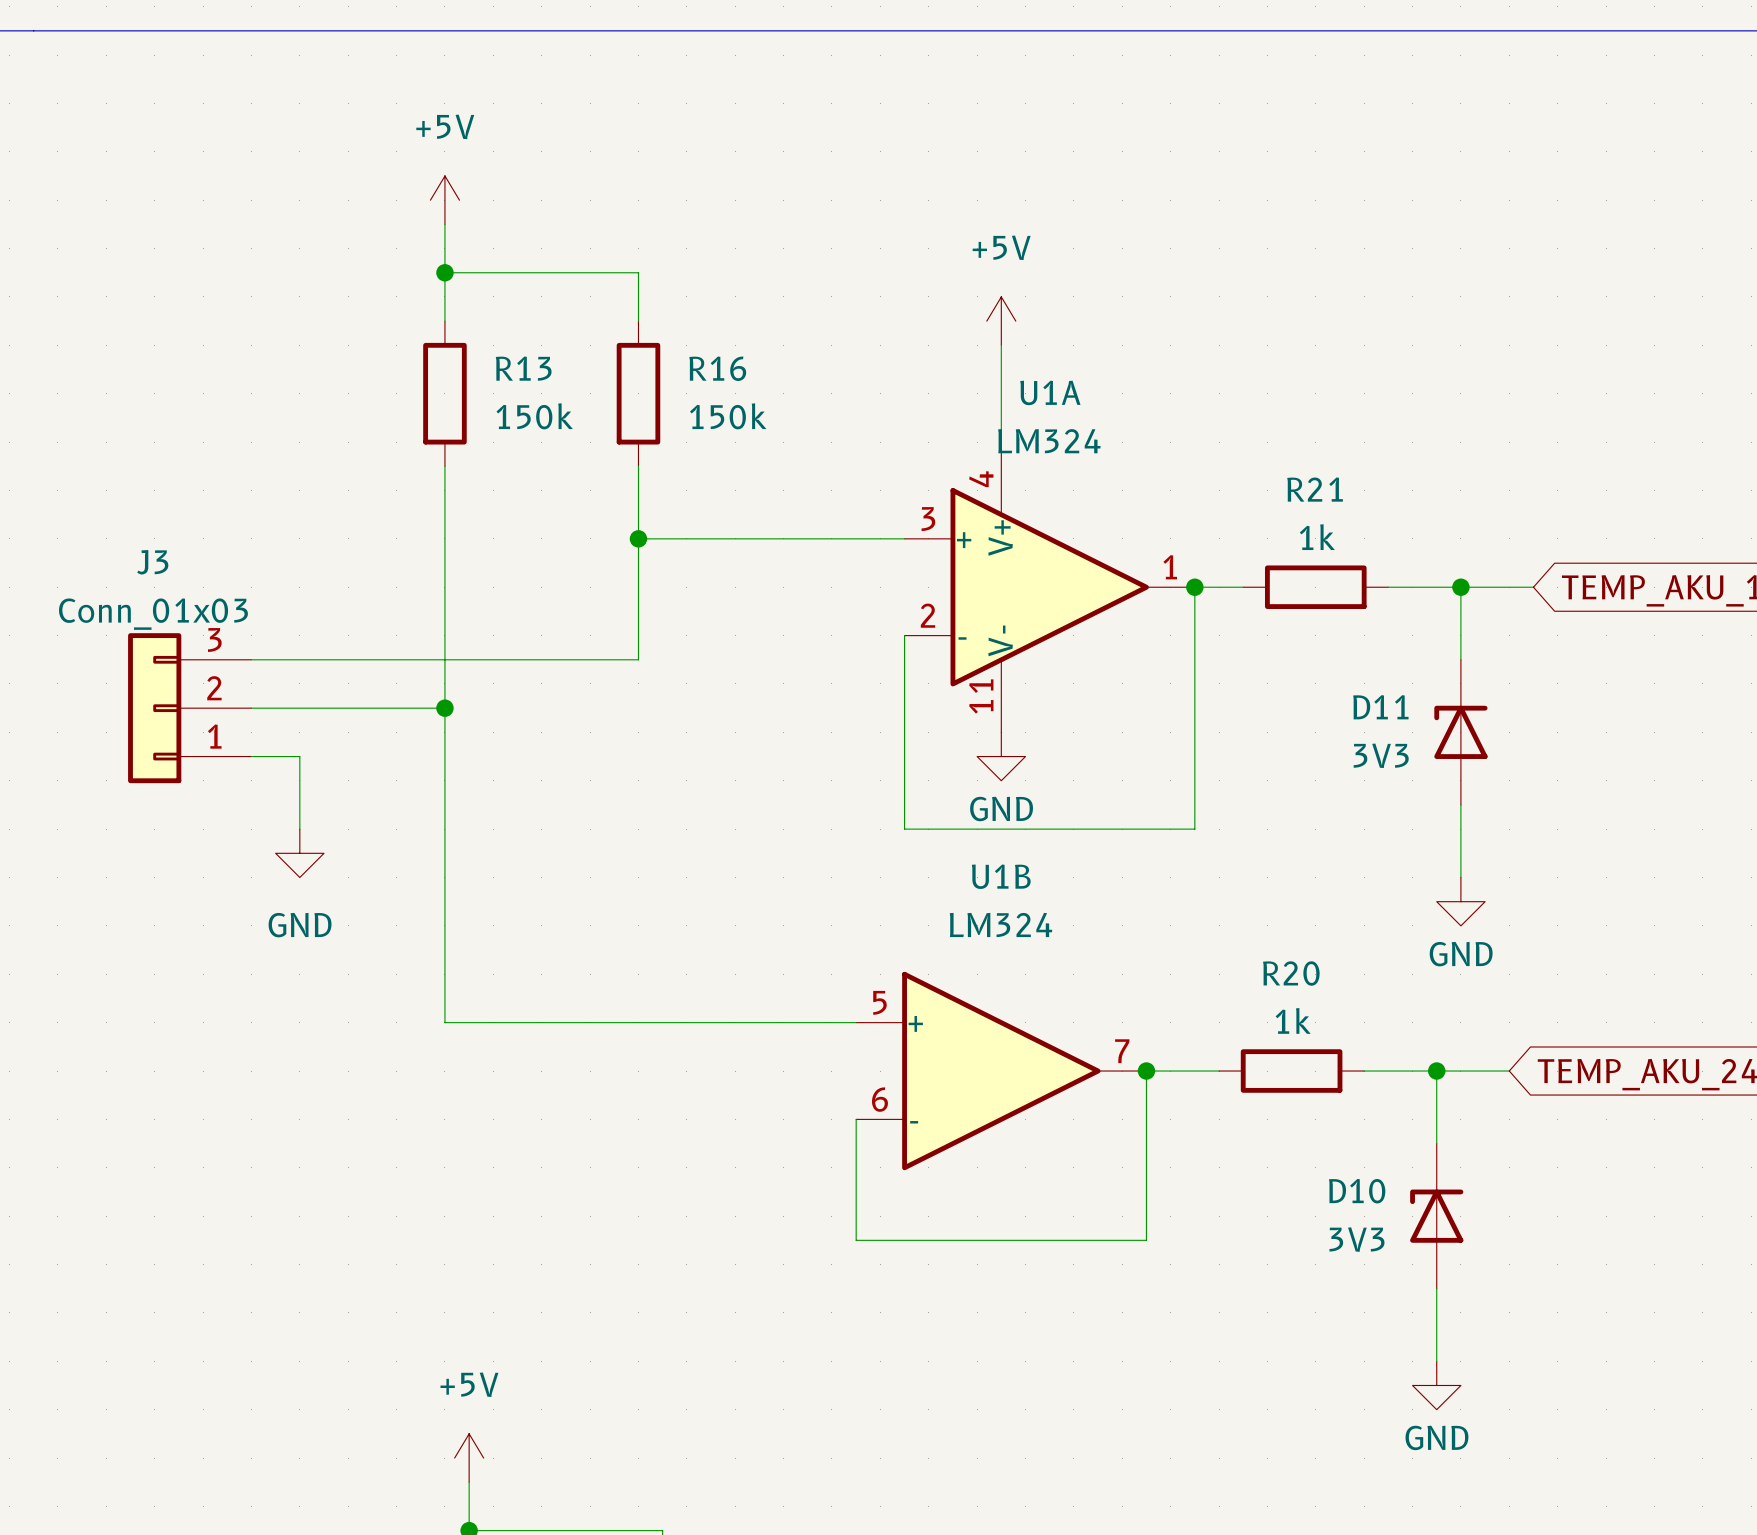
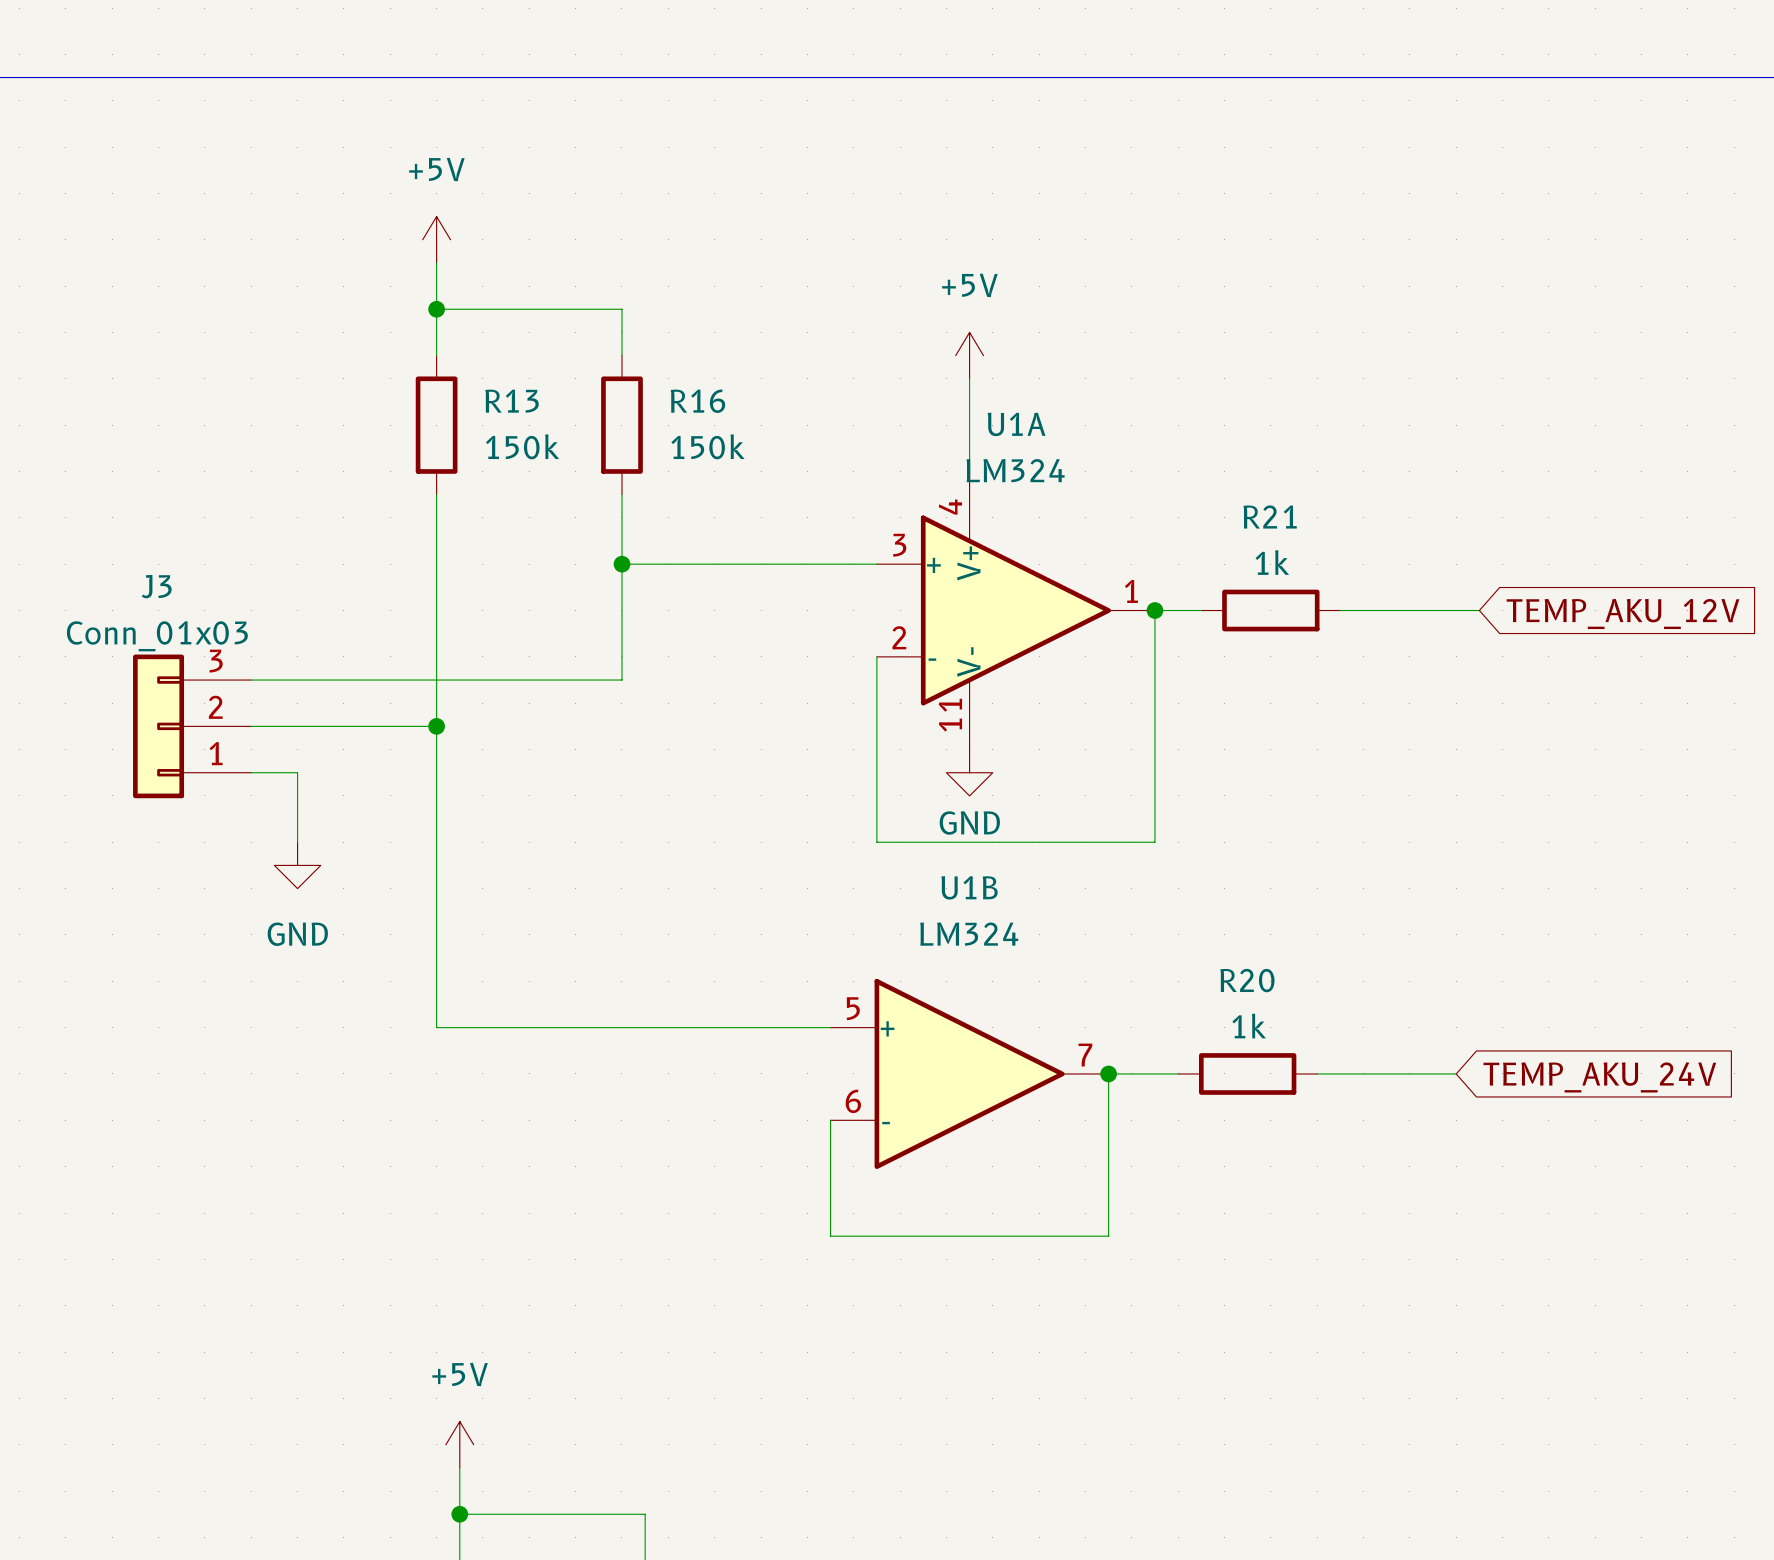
wire: (1460, 587) (1460, 659) -> none
junction: (1460, 587) -> none
D11: 3V3 (1460, 732) -> none
wire: (1460, 804) (1460, 877) -> none
power symbol: GND (1460, 901) -> none
wire: (1436, 1071) (1436, 1143) -> none
junction: (1436, 1071) -> none
D10: 3V3 (1436, 1216) -> none
wire: (1436, 1288) (1436, 1361) -> none
power symbol: GND (1436, 1385) -> none

